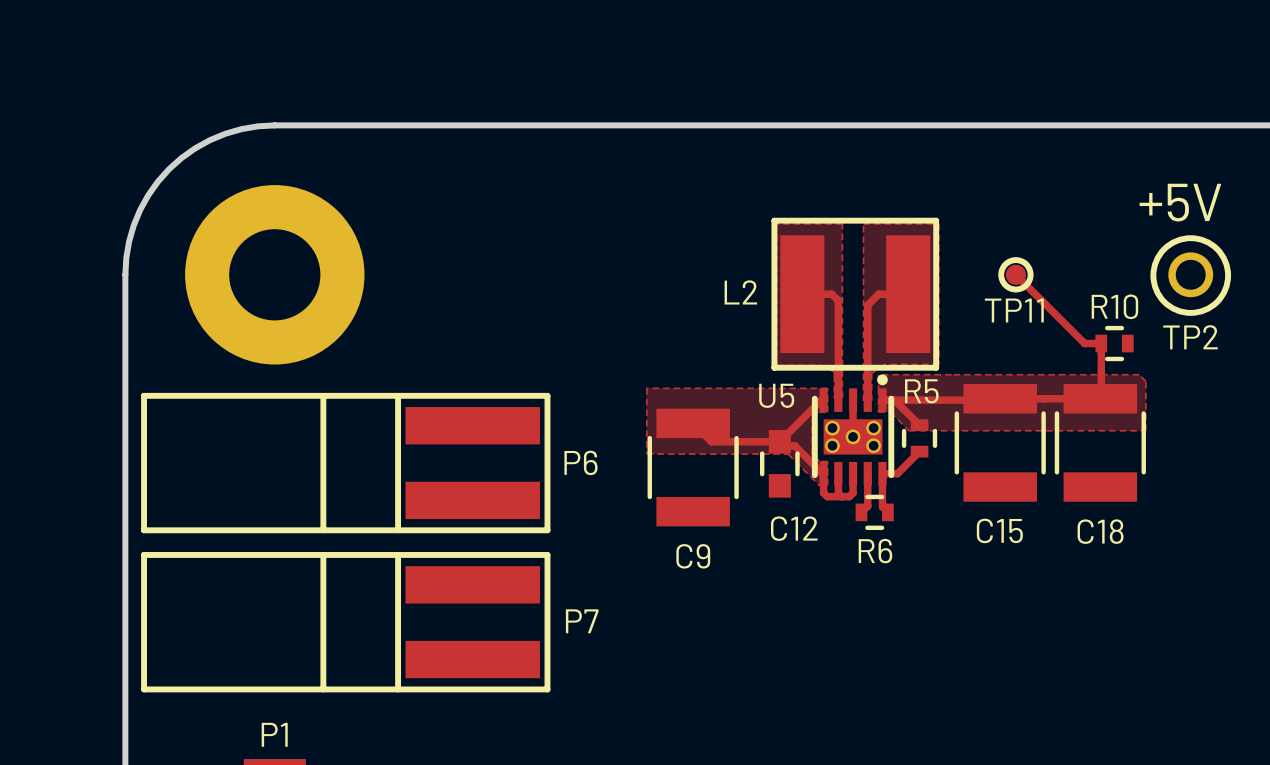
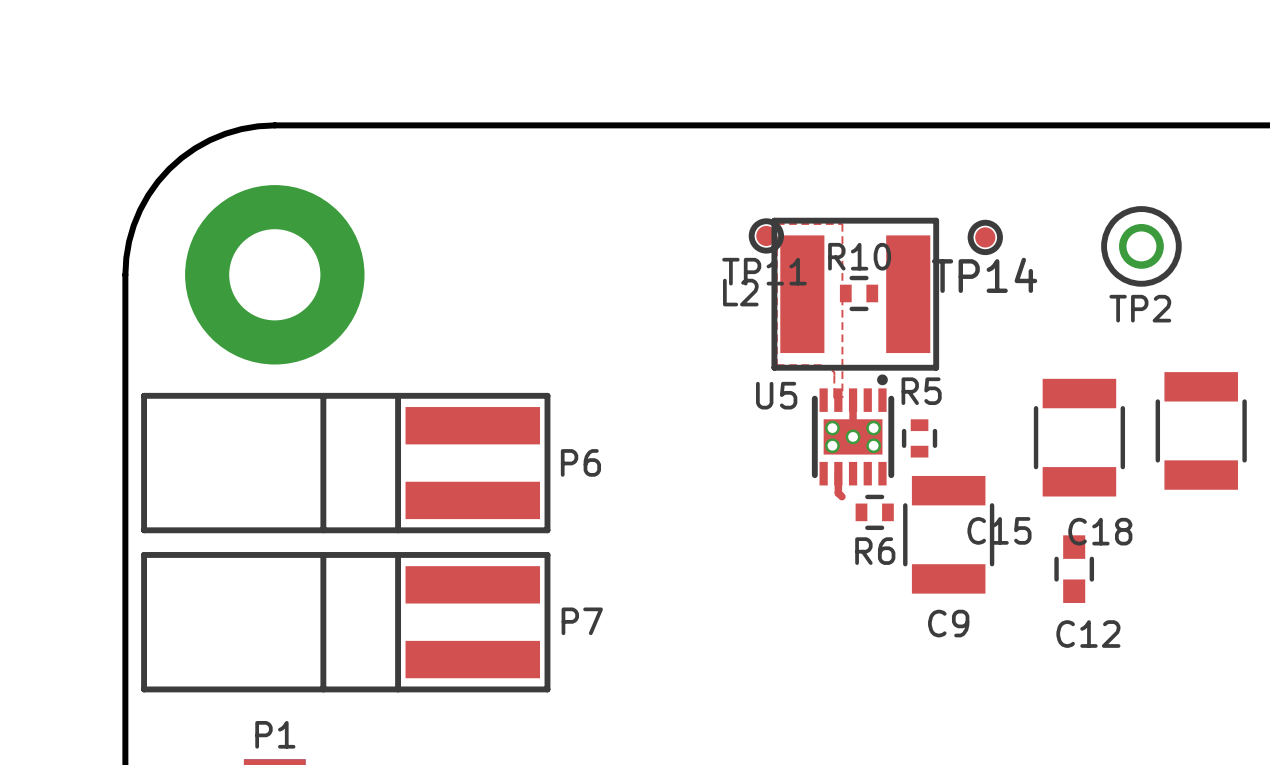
text: +5V (1180, 202) -> none
top zone outline: (863, 223) (938, 223) (938, 364) (884, 364) (871, 373) (871, 401) (863, 401) (863, 223) -> none
TP14: none -> (985, 237)
top track: (1015, 274) (1084, 343) (1101, 343) (1100, 398) (882, 400) -> none
TP11 position: (1015, 274) -> (766, 235)
TP2 position: (1190, 275) -> (1141, 246)
top track: (802, 294) (831, 294) (838, 300) (838, 400) -> none
top track: (908, 294) (878, 294) (867, 305) (867, 400) -> none
R10 position: (1114, 343) -> (859, 293)
top zone outline: (878, 374) (878, 412) (890, 412) (909, 430) (1145, 430) (1145, 381) (1139, 374) (878, 374) -> none
top zone outline: (646, 388) (827, 388) (827, 412) (819, 412) (811, 419) (811, 454) (819, 461) (827, 461) (827, 485) (819, 485) (788, 454) (646, 454) (646, 388) -> none
top track: (823, 400) (821, 400) (779, 442) -> none
top track: (894, 400) (919, 425) -> none
top track: (693, 423) (711, 441) (781, 441) (785, 445) (794, 445) (823, 473) (823, 492) (827, 496) (849, 496) (853, 492) (853, 473) -> none
C15 position: (1000, 442) -> (1079, 437)
C18 position: (1100, 442) -> (1201, 430)
top track: (919, 451) (897, 473) (882, 473) (882, 506) (887, 512) -> none
C12 position: (779, 463) -> (1074, 569)
C9 position: (693, 467) -> (948, 534)
top track: (867, 473) (867, 506) (861, 512) -> none

